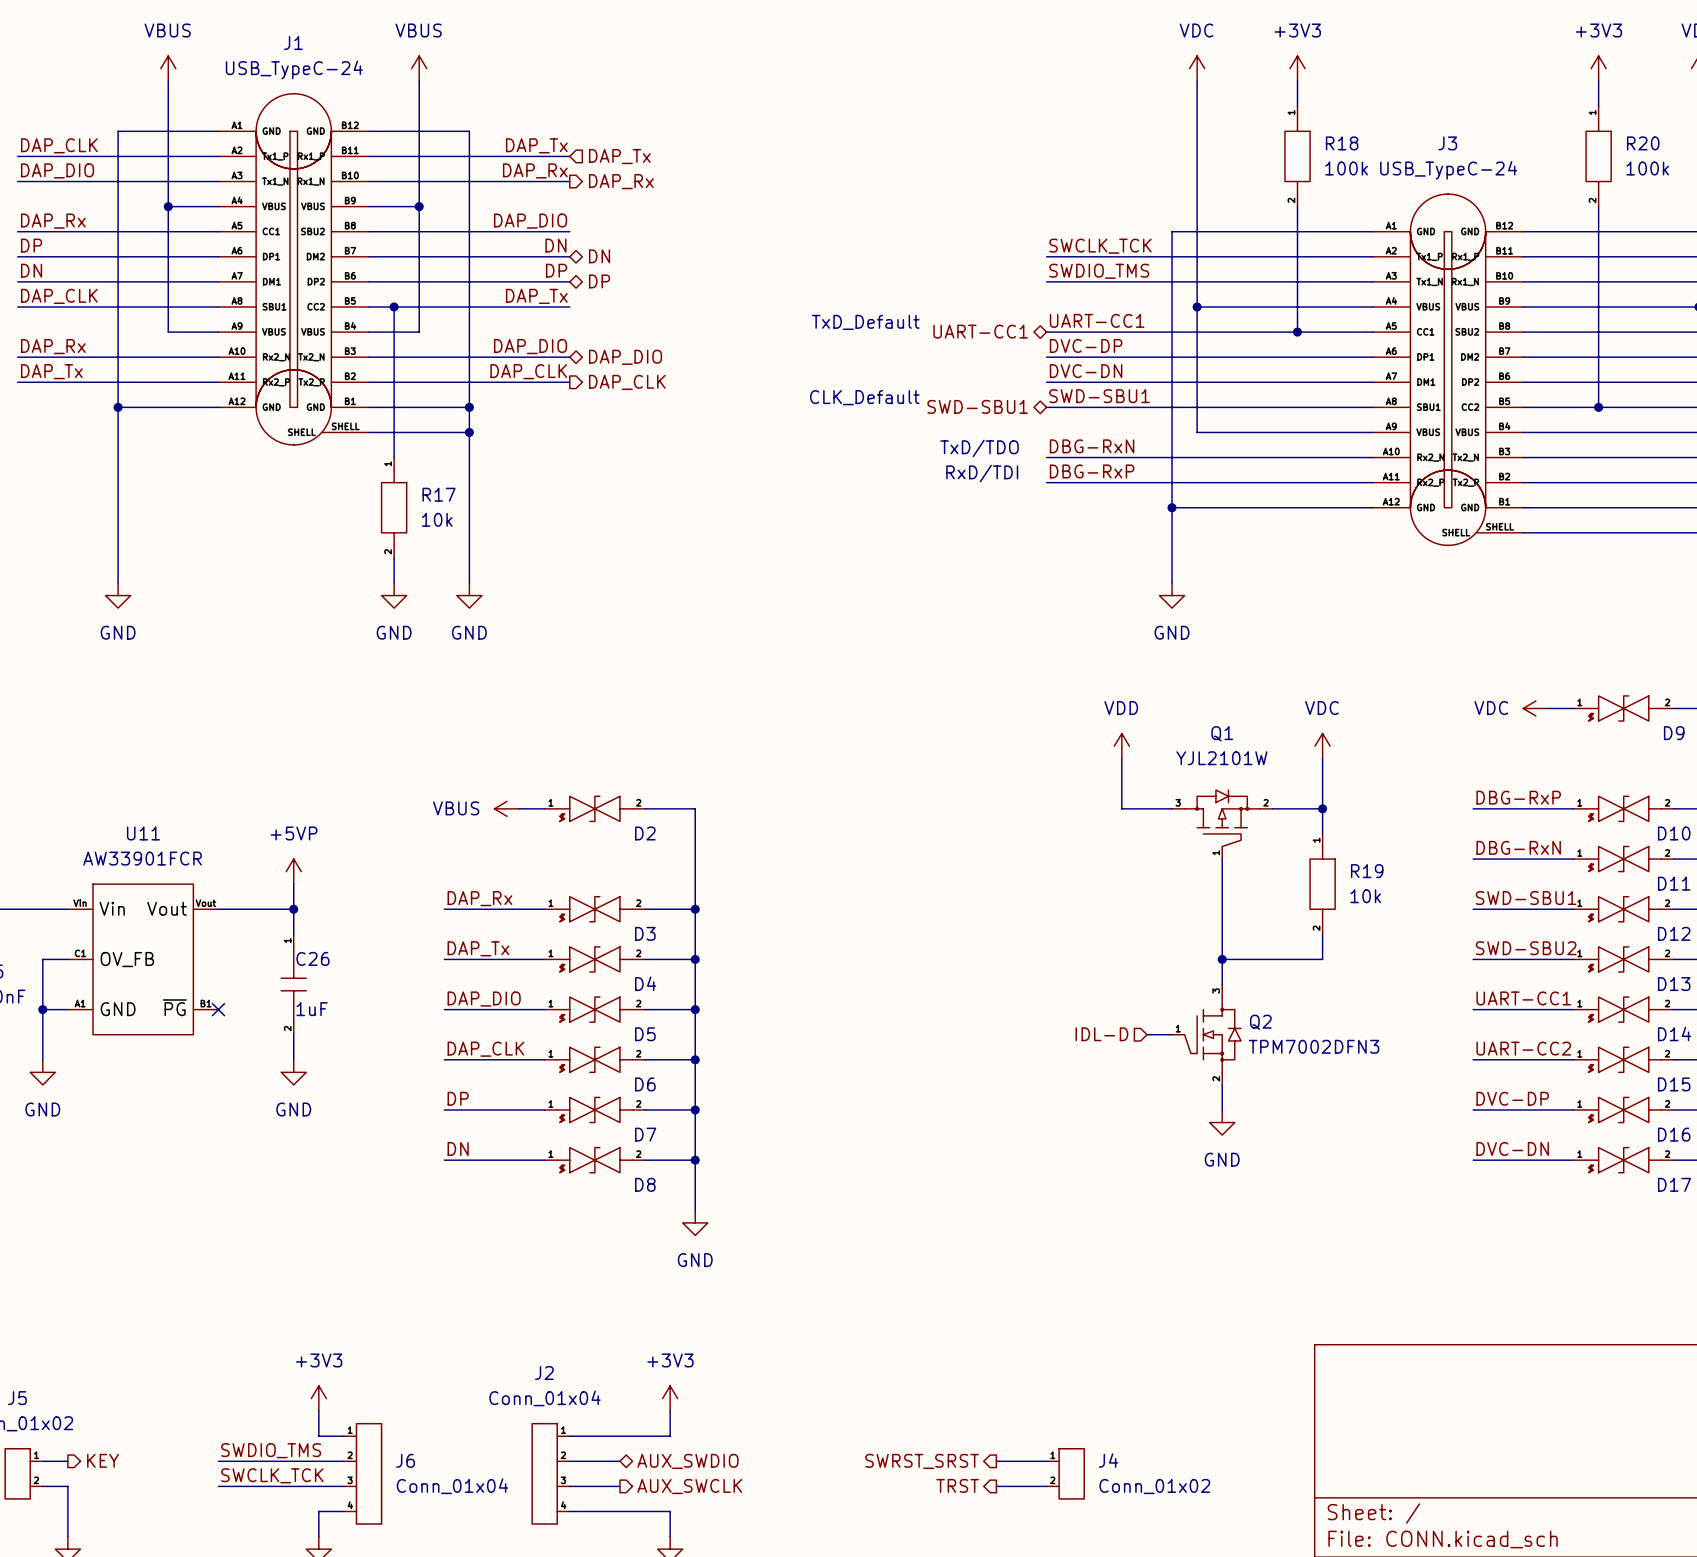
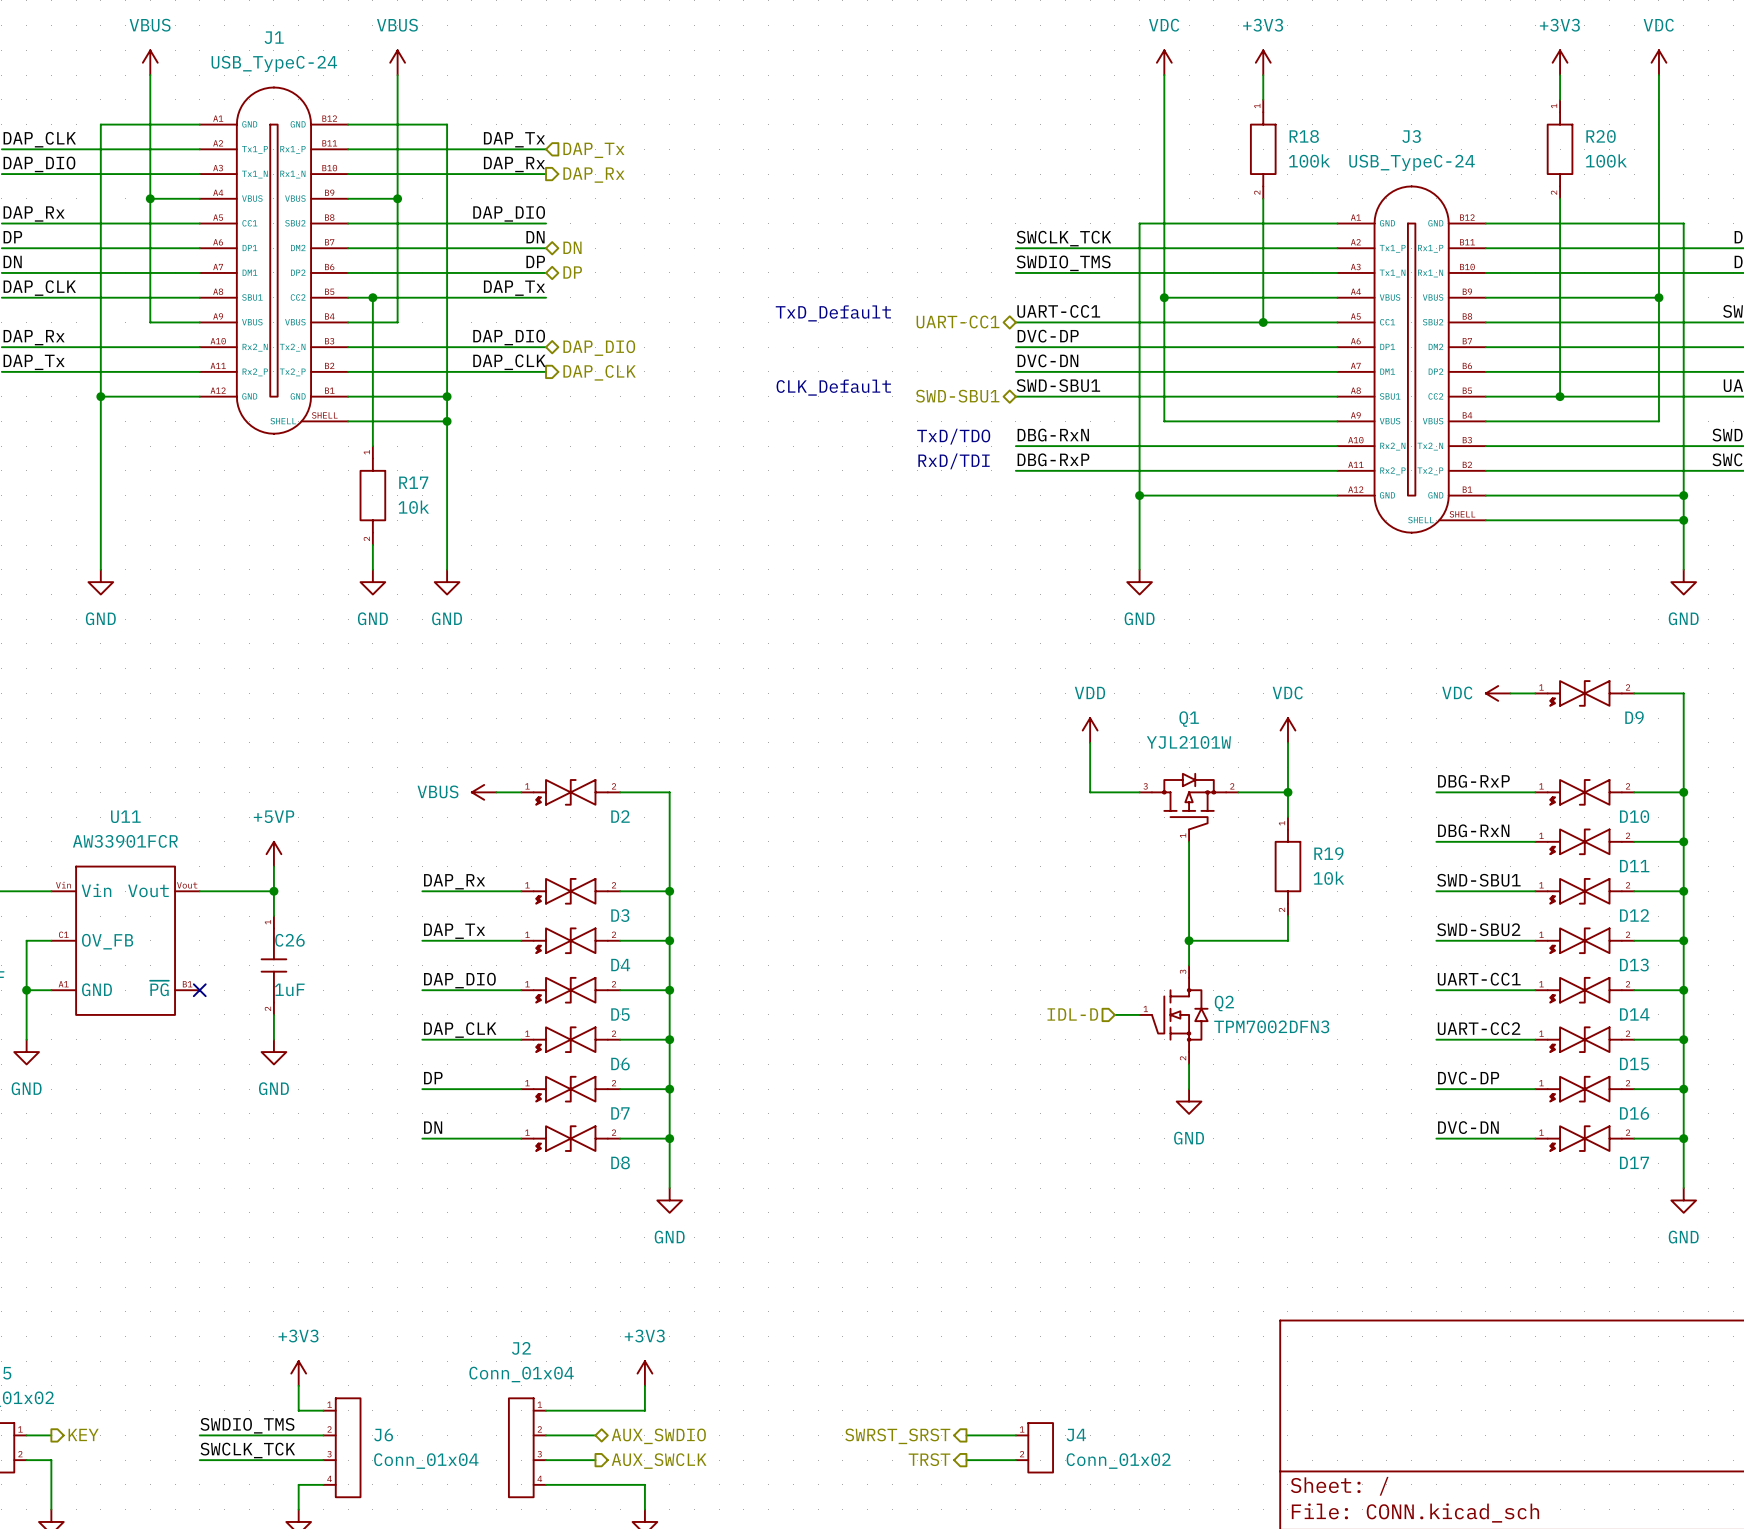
J1 symbol: [218, 93, 370, 446] -> [199, 87, 349, 434]
J3 symbol: [1372, 194, 1524, 546] -> [1337, 186, 1486, 533]

